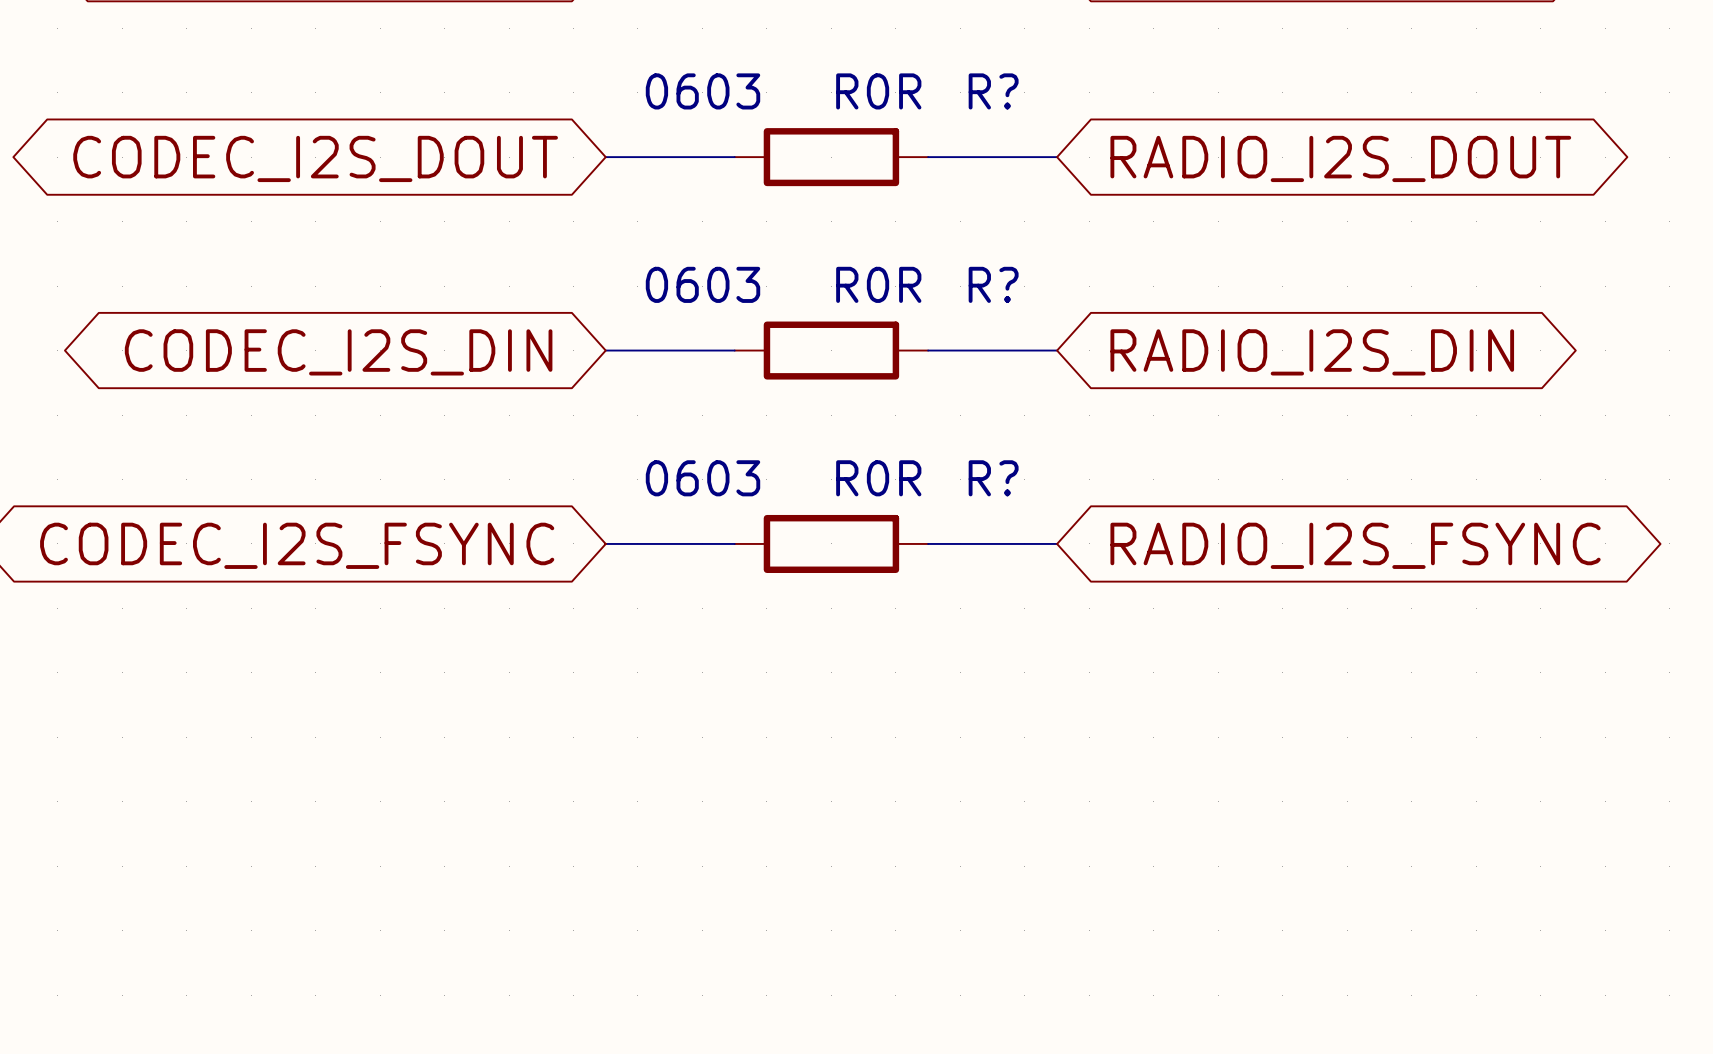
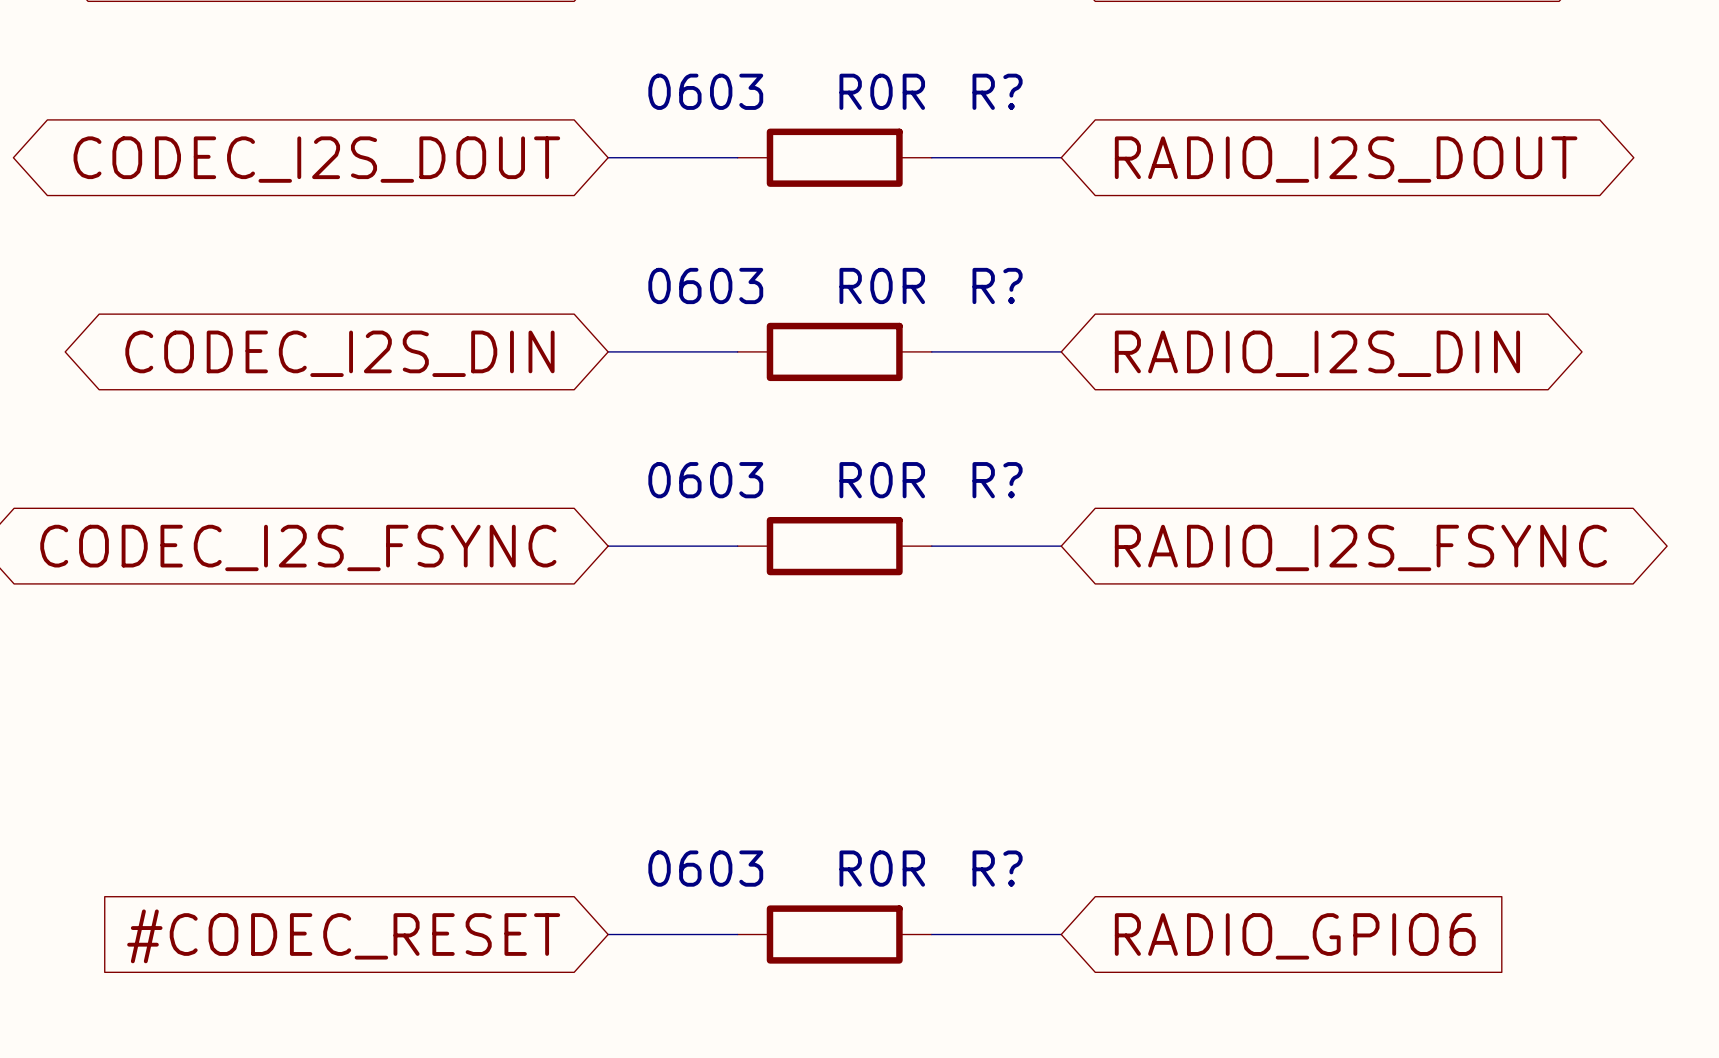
wire: none -> (608, 934) (737, 934)
R?: none -> R0R (834, 934)
wire: none -> (931, 934) (1061, 934)
global label: none -> #CODEC_RESET (343, 936)
global label: none -> RADIO_GPIO6 (1295, 936)

